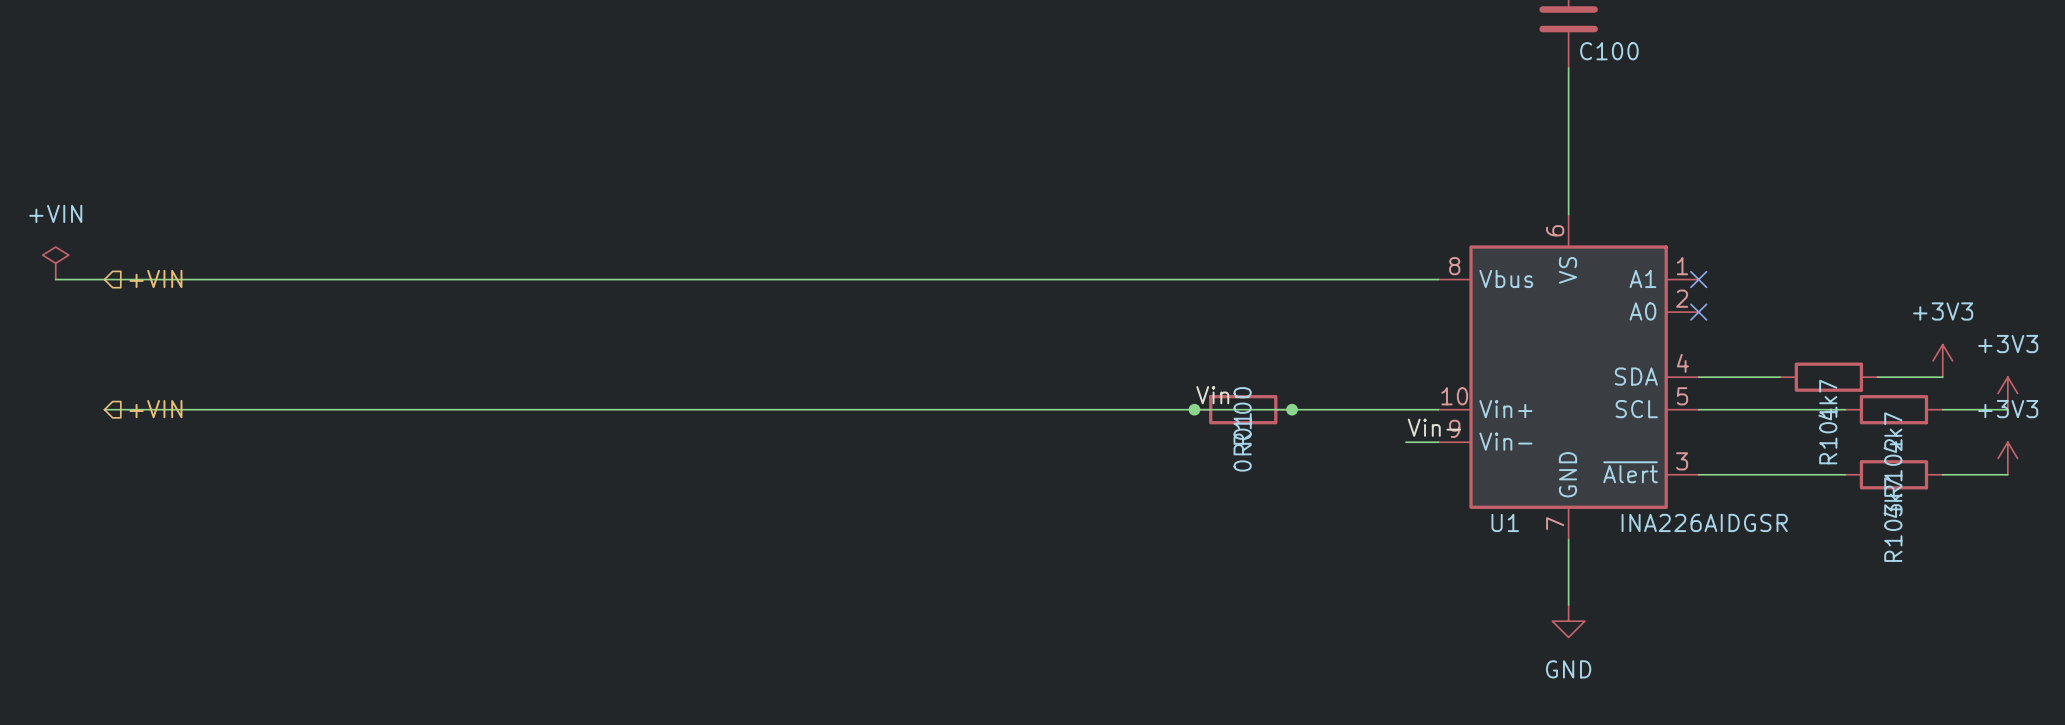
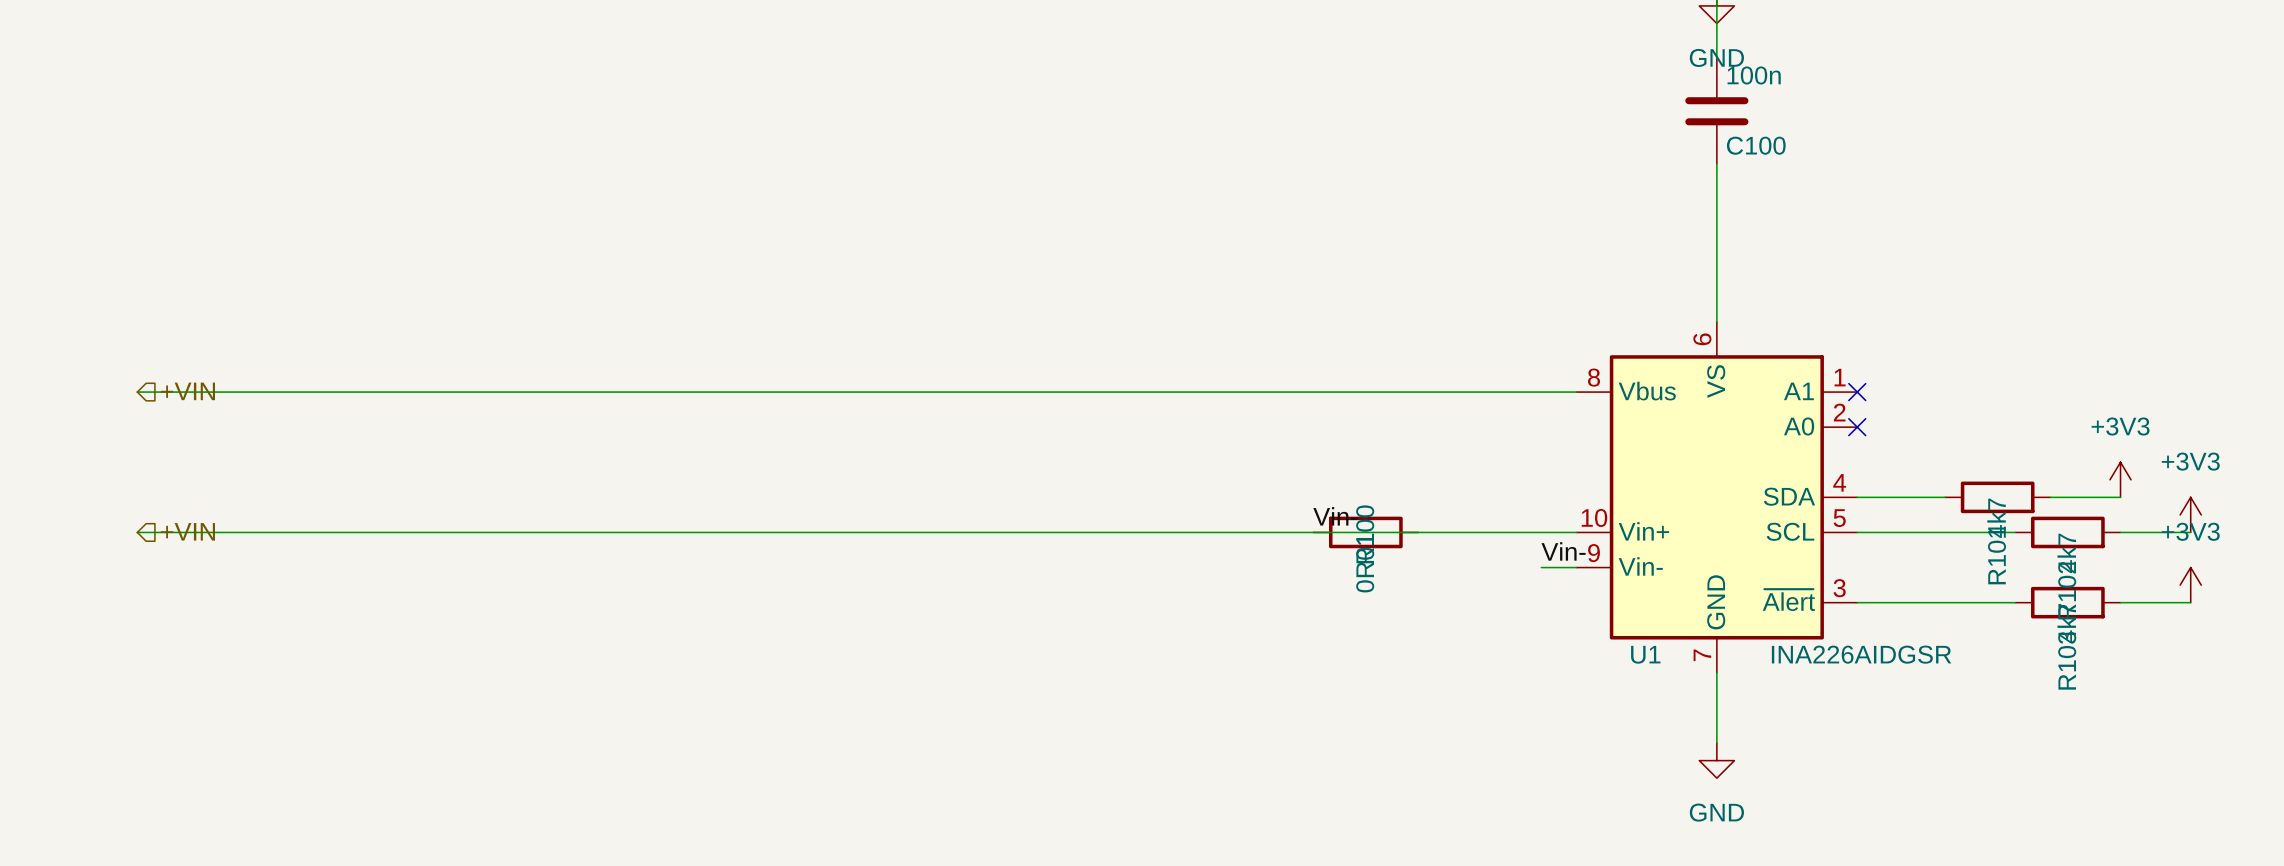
power symbol: +VIN (55, 263) -> none
wire: (55, 279) (104, 279) -> none
junction: (1194, 409) -> none
junction: (1292, 409) -> none

